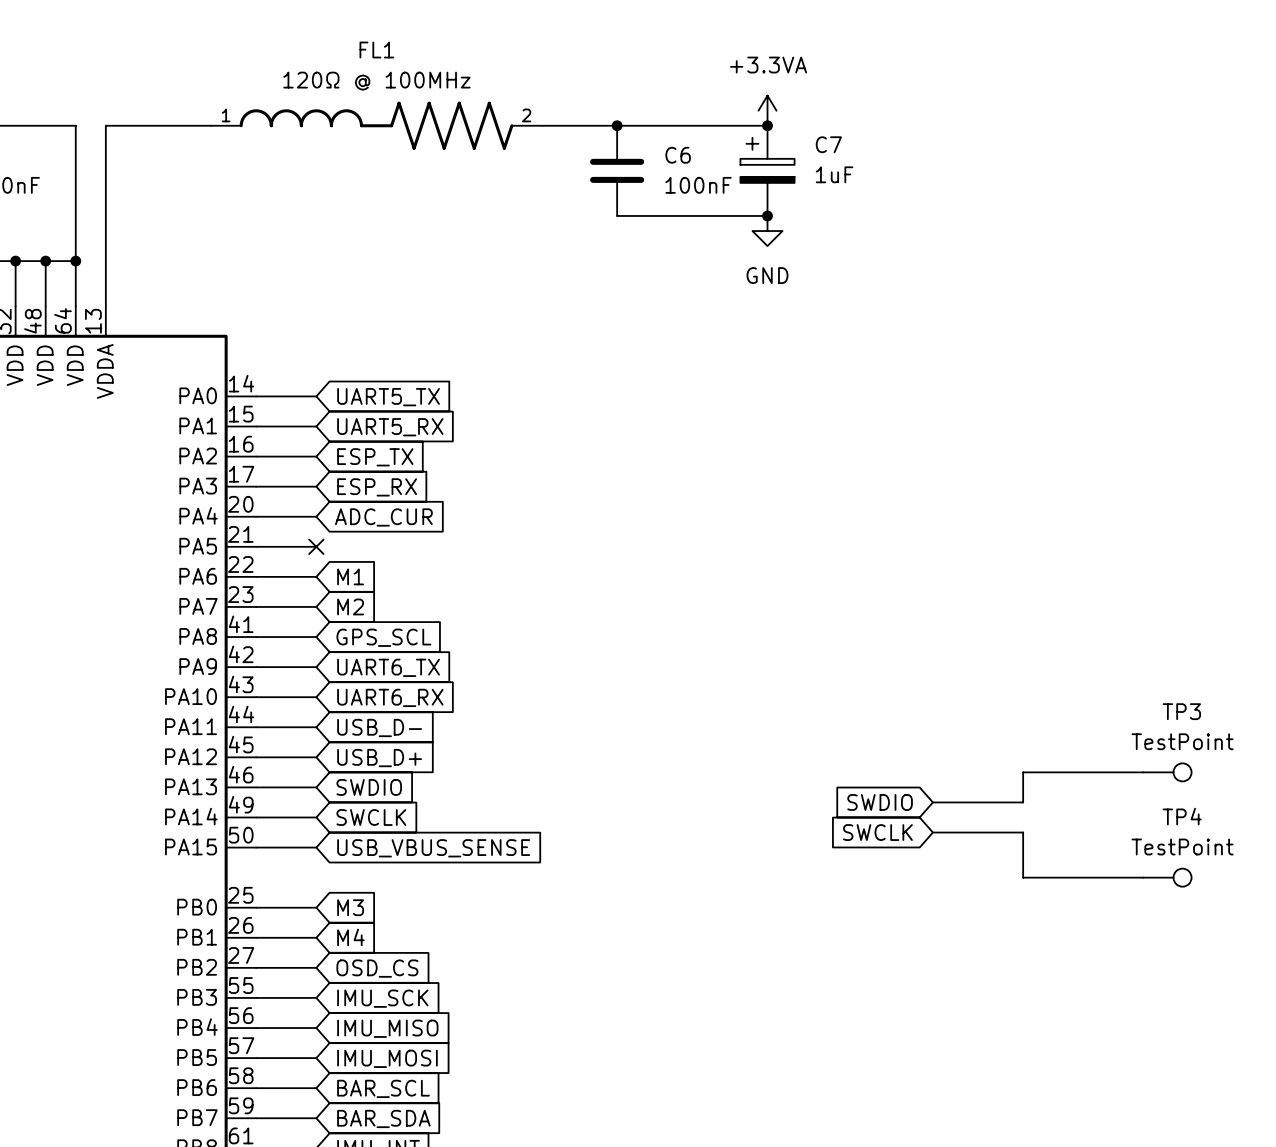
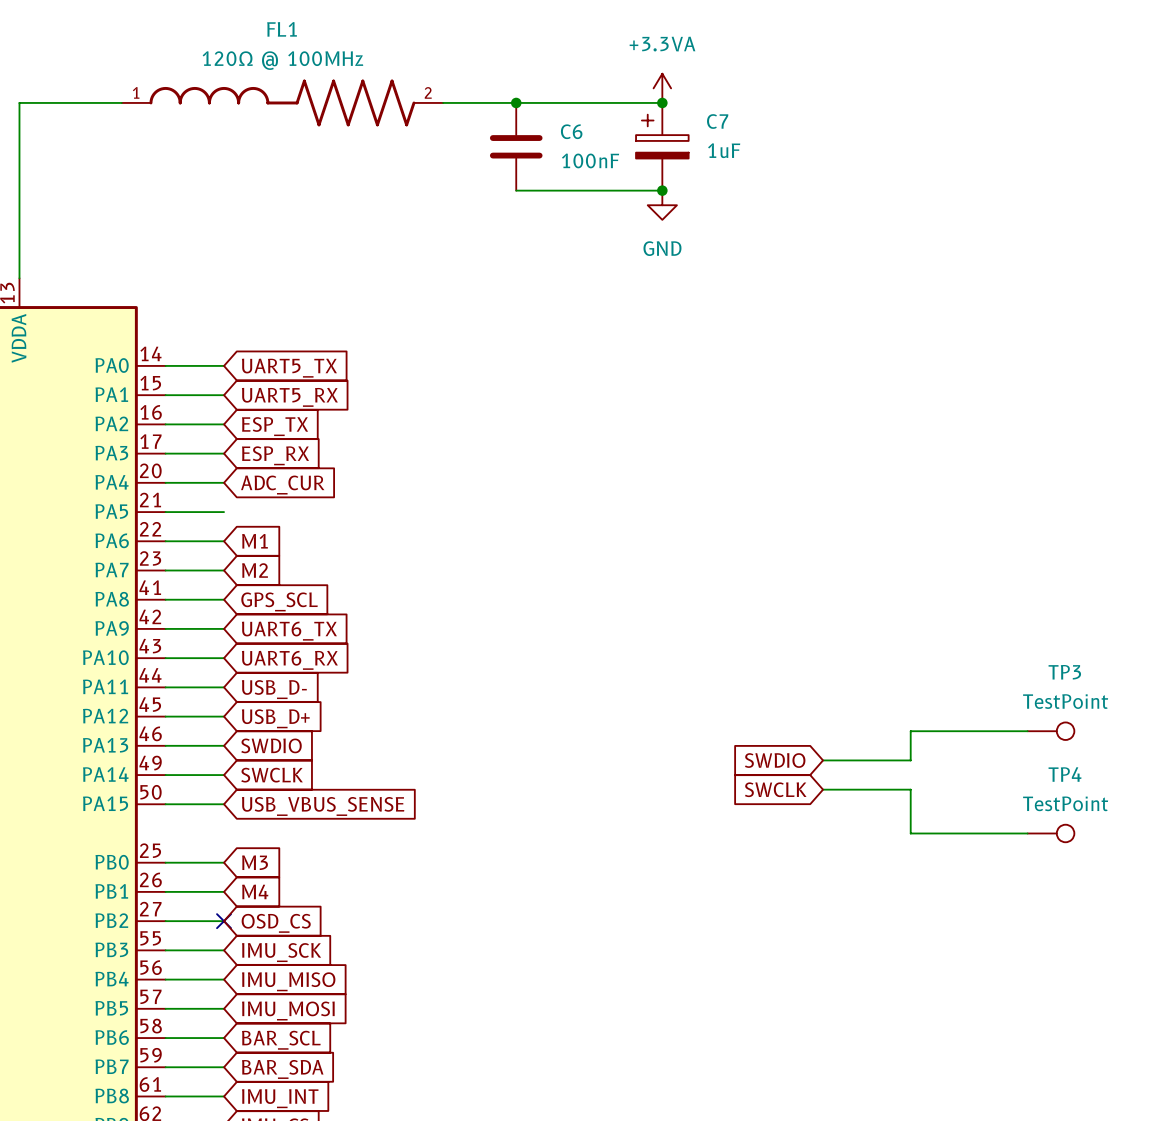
no-connect mark: (316, 546) -> none
no-connect mark: none -> (224, 921)

